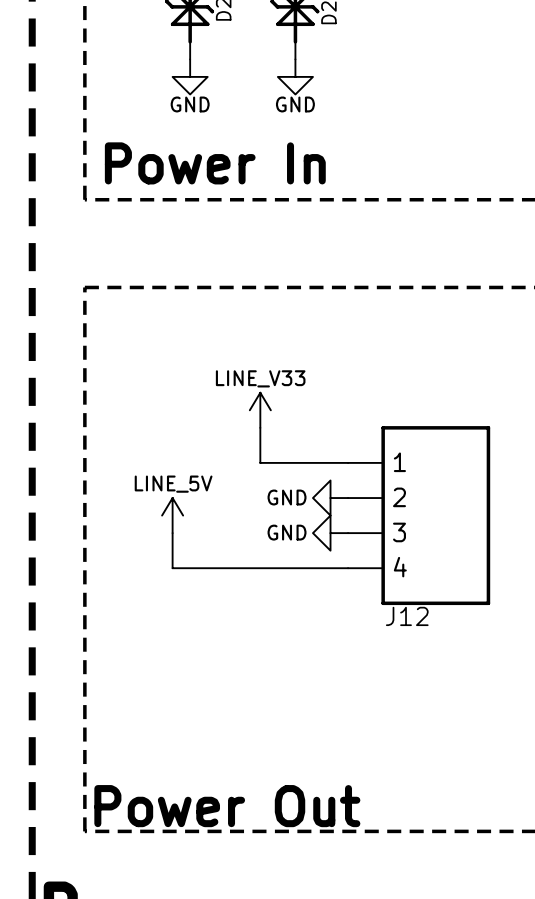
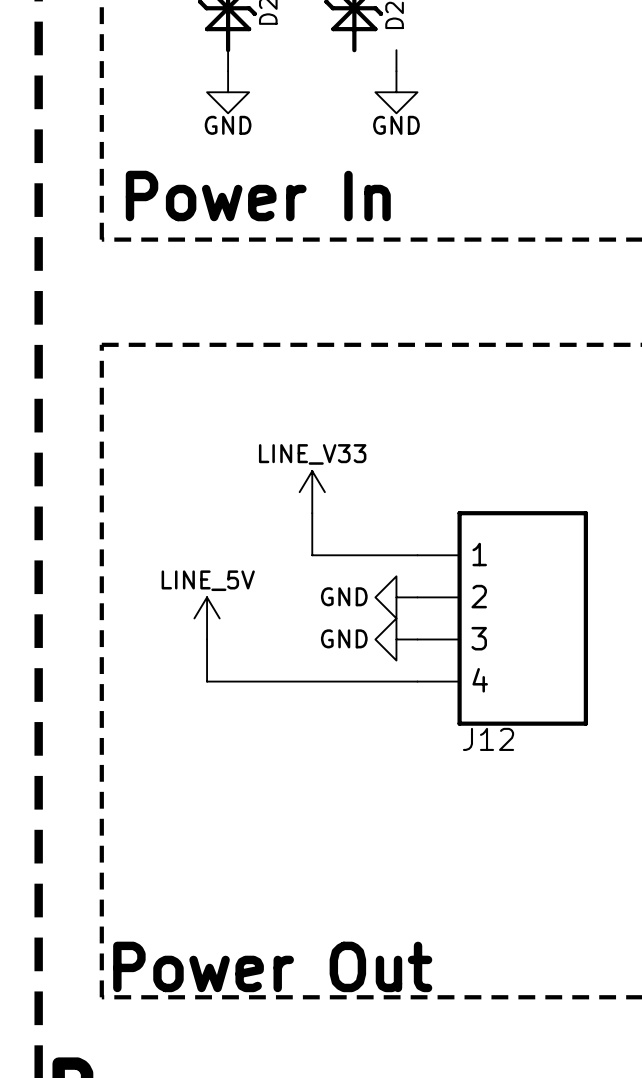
wire: (295, 41) (295, 59) -> (396, 50) (396, 71)
power symbol position: GND (295, 76) -> GND (396, 92)

